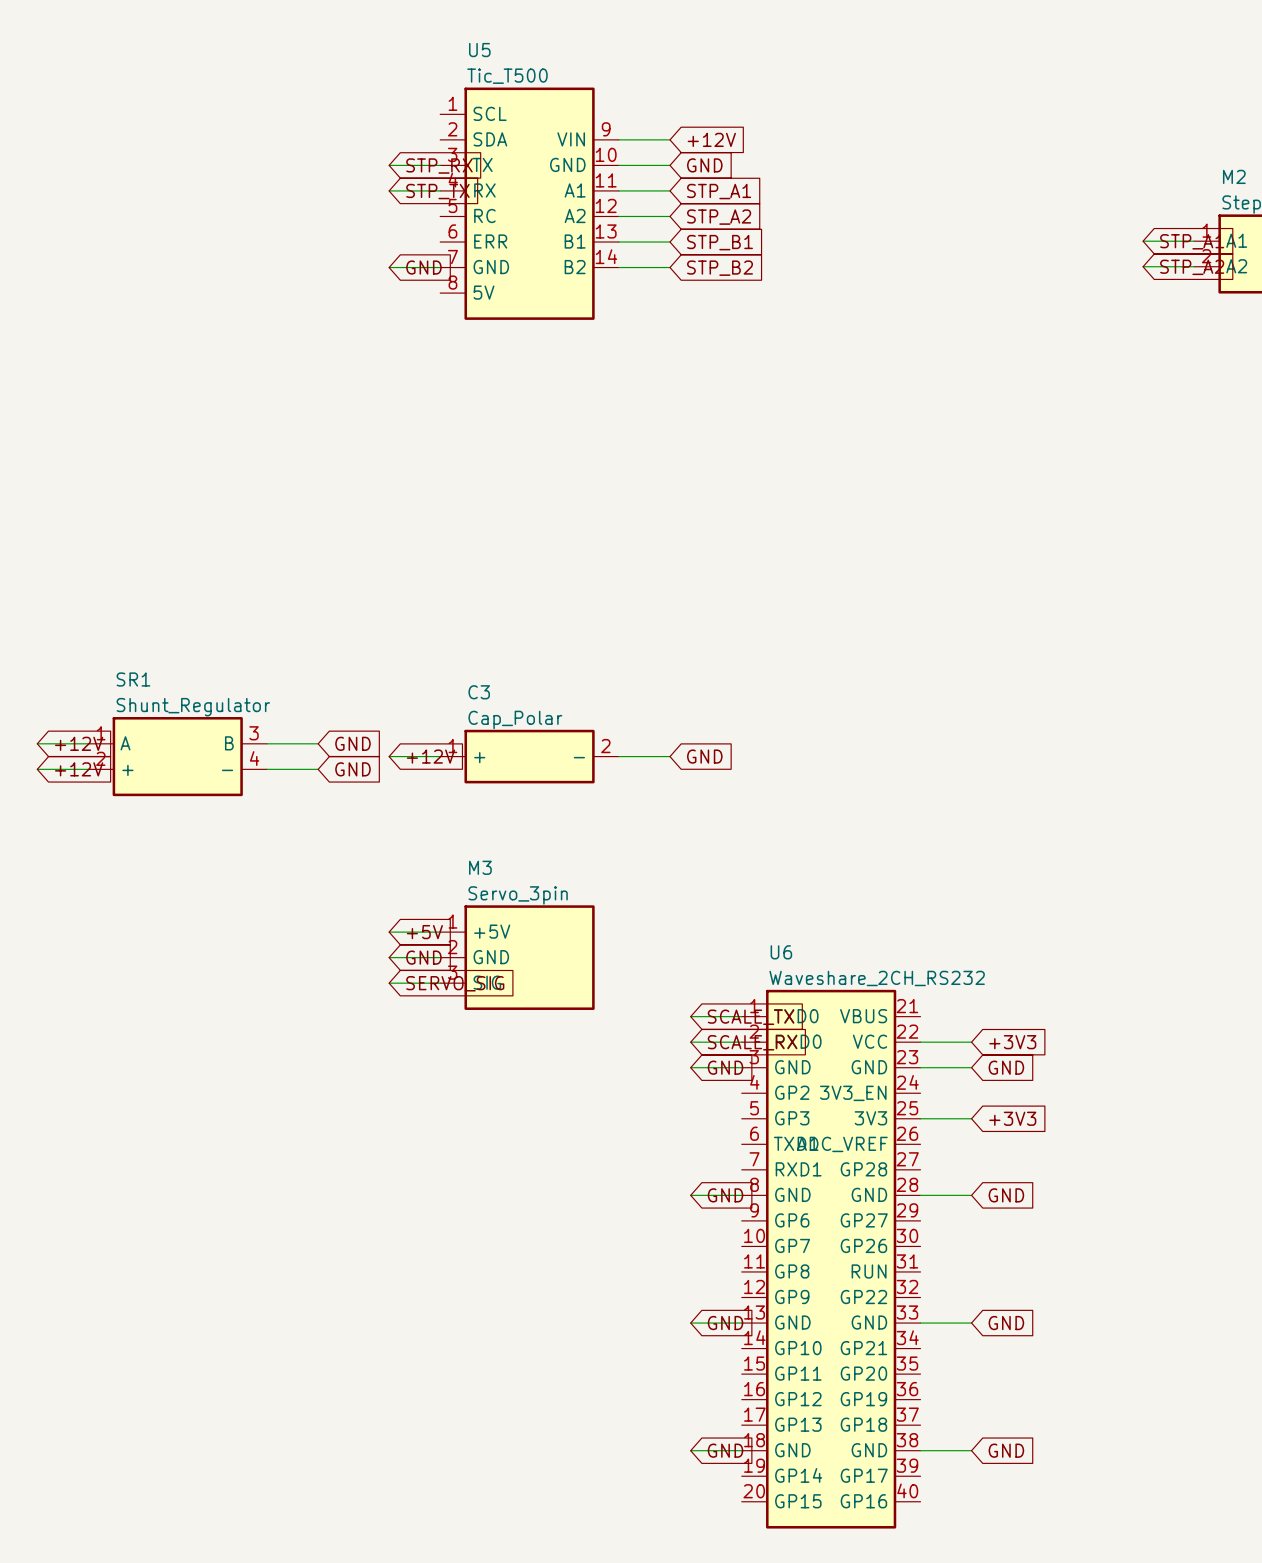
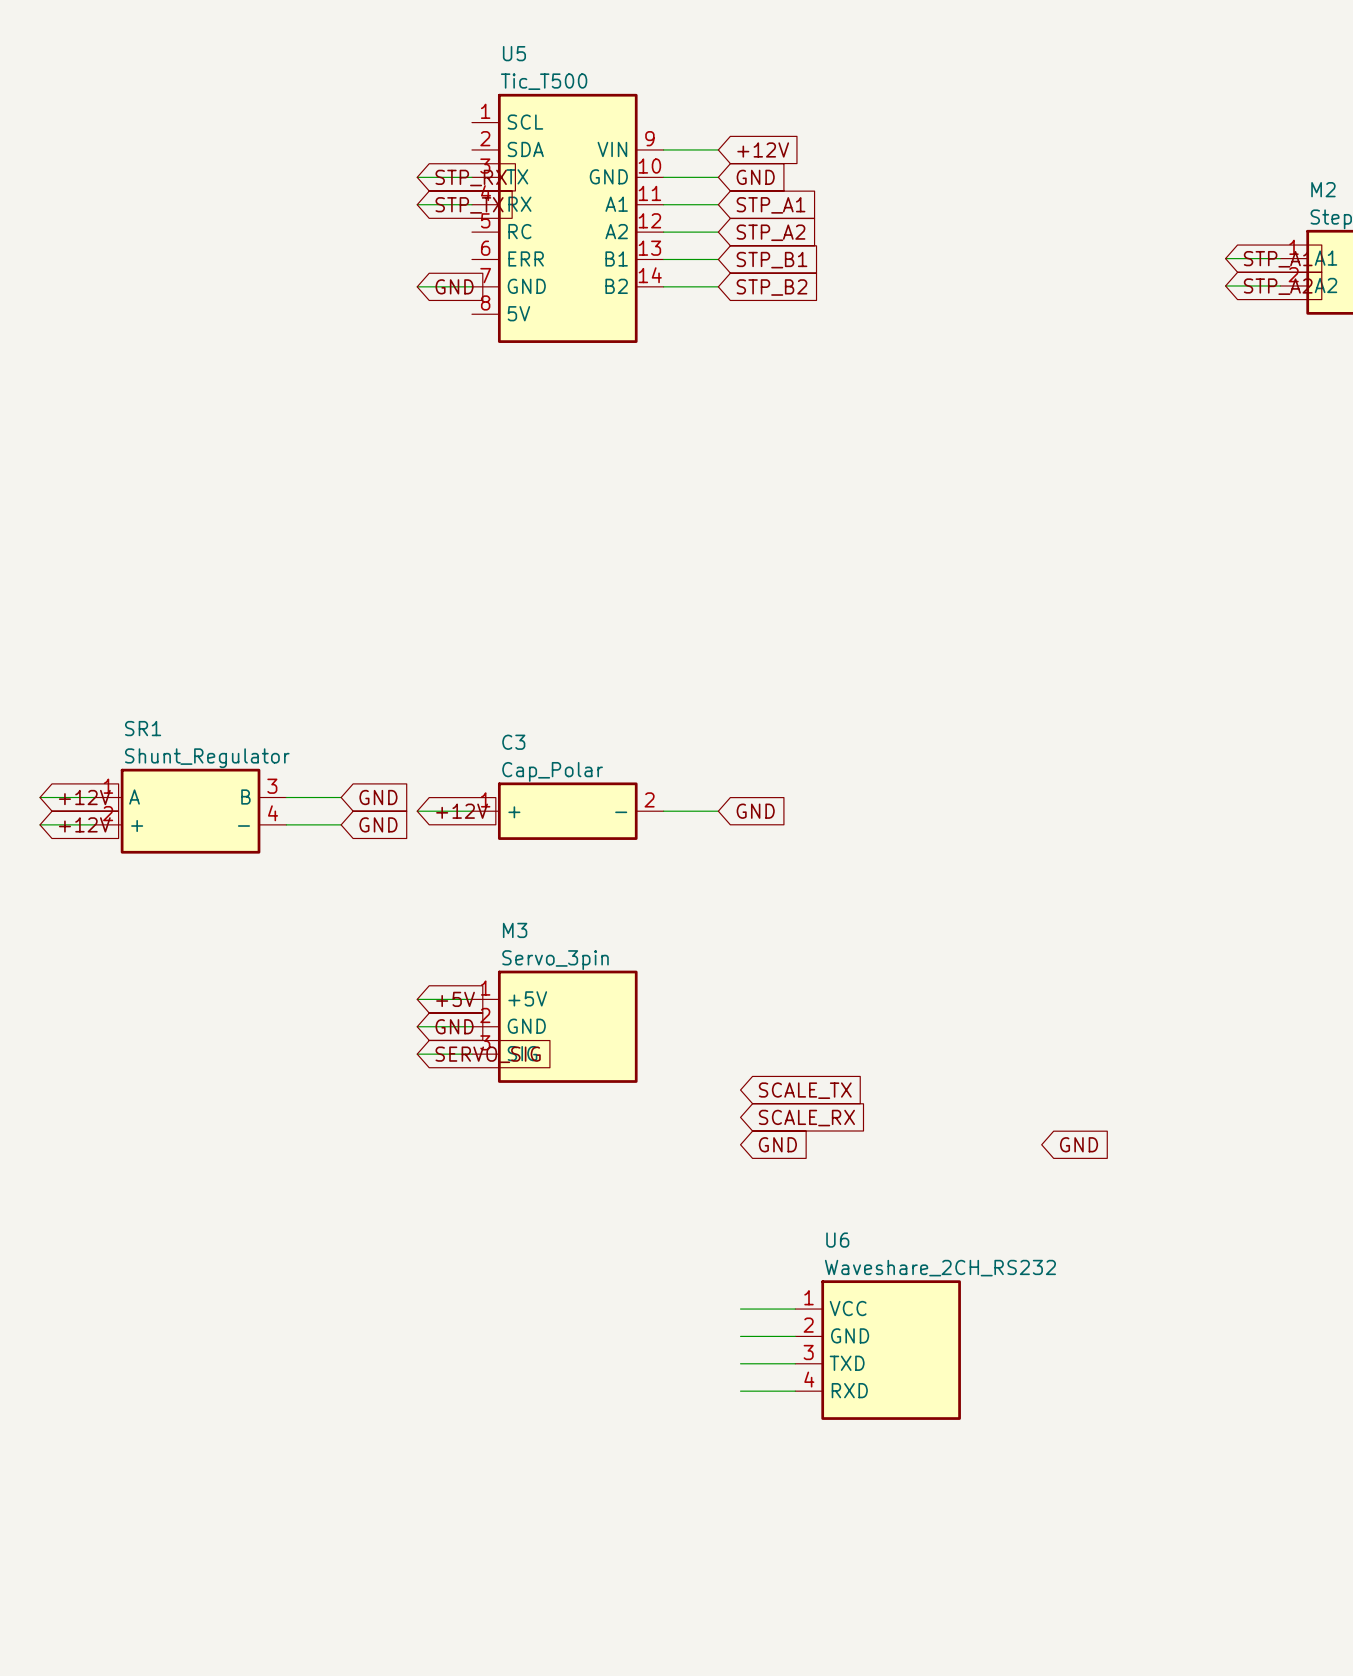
U6 name position: U6 (781, 952) -> U6 (837, 1240)
U6 value position: Waveshare_2CH_RS232 (877, 978) -> Waveshare_2CH_RS232 (940, 1268)
U6 symbol: [741, 989, 921, 1529] -> [795, 1280, 961, 1420]
wire: (690, 1016) (741, 1016) -> (740, 1309) (795, 1309)
wire: (690, 1042) (741, 1042) -> (740, 1336) (795, 1336)
wire: (920, 1042) (971, 1042) -> none
global label: +3V3 (1012, 1042) -> none
wire: (690, 1067) (741, 1067) -> (740, 1363) (795, 1363)
wire: (920, 1067) (971, 1067) -> none
wire: (920, 1118) (971, 1118) -> none
global label: +3V3 (1012, 1118) -> none
wire: (690, 1195) (741, 1195) -> none
global label: GND (725, 1195) -> none
wire: (920, 1195) (971, 1195) -> none
global label: GND (1006, 1195) -> none
wire: (690, 1323) (741, 1323) -> (740, 1391) (795, 1391)
global label: GND (725, 1323) -> none
wire: (920, 1323) (971, 1323) -> none
global label: GND (1006, 1323) -> none
wire: (690, 1450) (741, 1450) -> none
global label: GND (725, 1450) -> none
wire: (920, 1450) (971, 1450) -> none
global label: GND (1006, 1450) -> none

